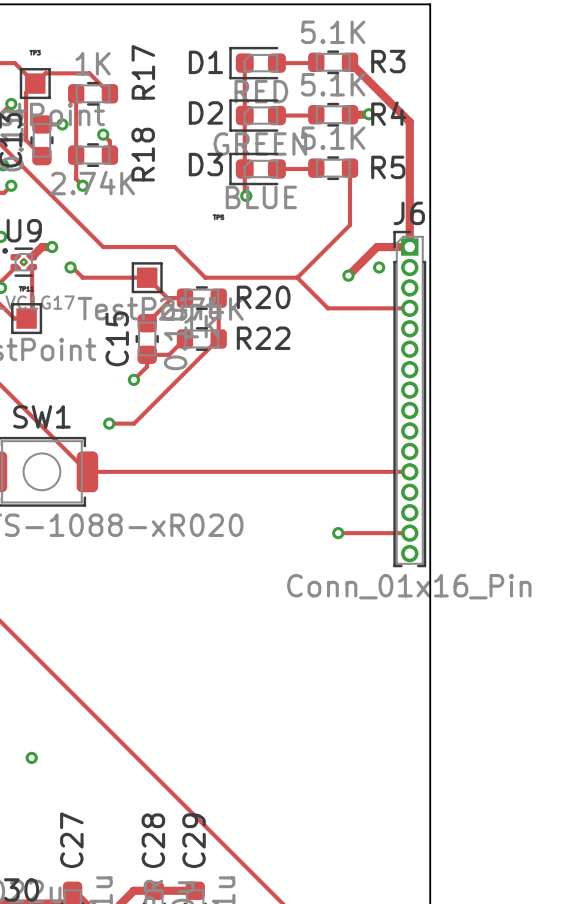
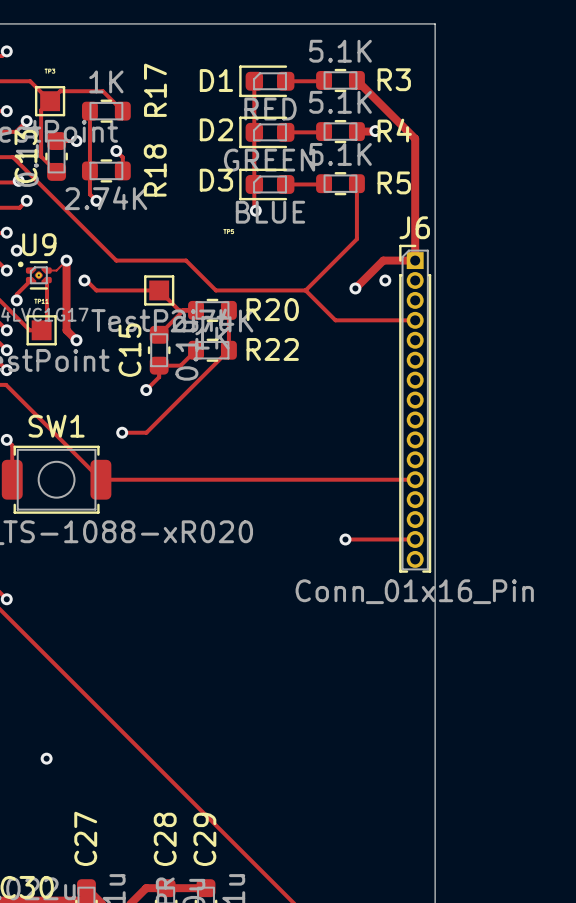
track: (52, 247) (41, 247) (33, 255) -> none
track: none -> (46, 270) (56, 270) (66, 260) (66, 330) (76, 340)
via: none -> (76, 340)

